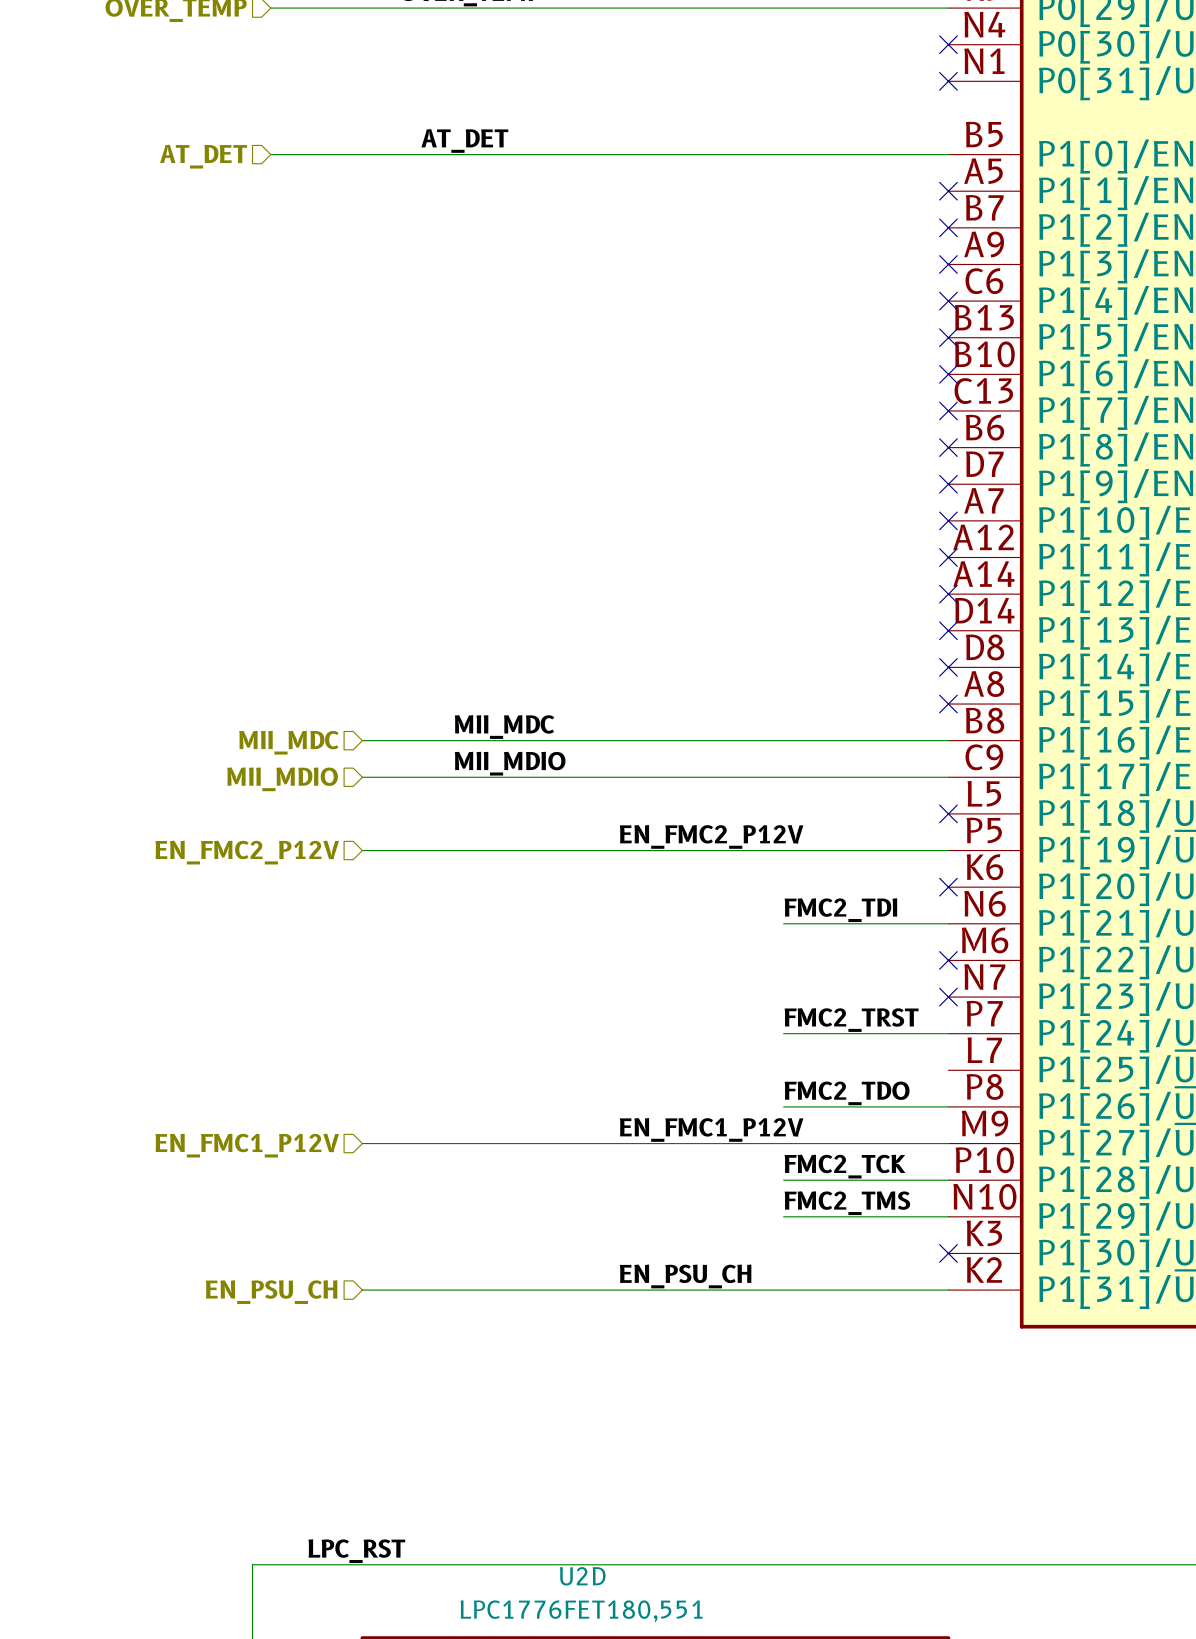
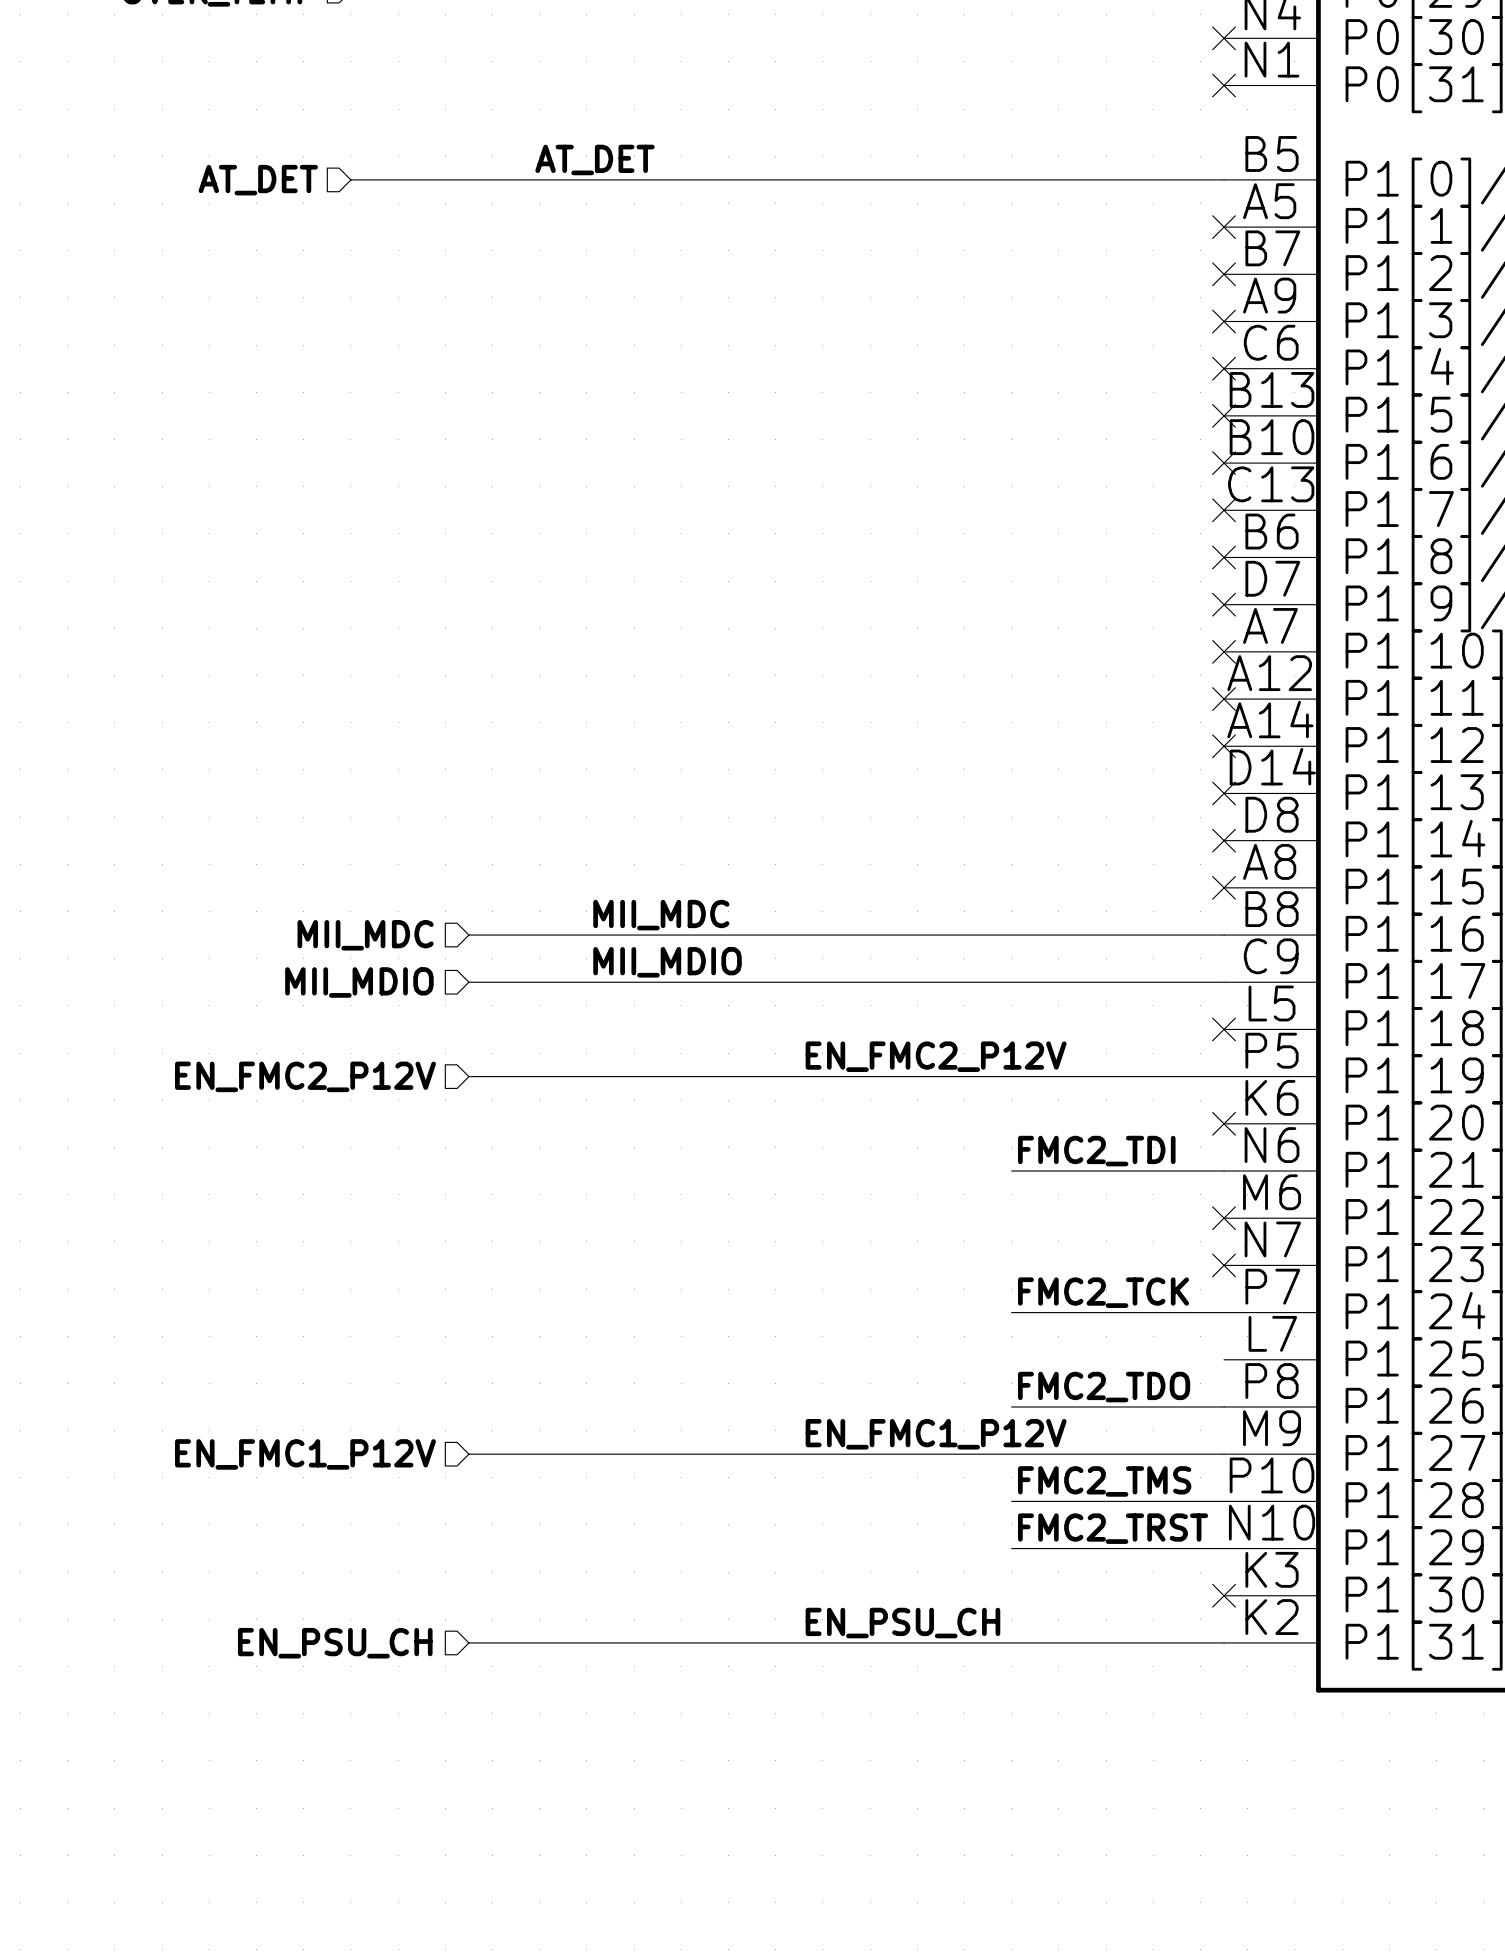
label: FMC2_TRST (851, 1020) -> FMC2_TCK (1103, 1292)
label: FMC2_TCK (845, 1166) -> FMC2_TMS (1104, 1481)
label: FMC2_TMS (847, 1203) -> FMC2_TRST (1113, 1528)

